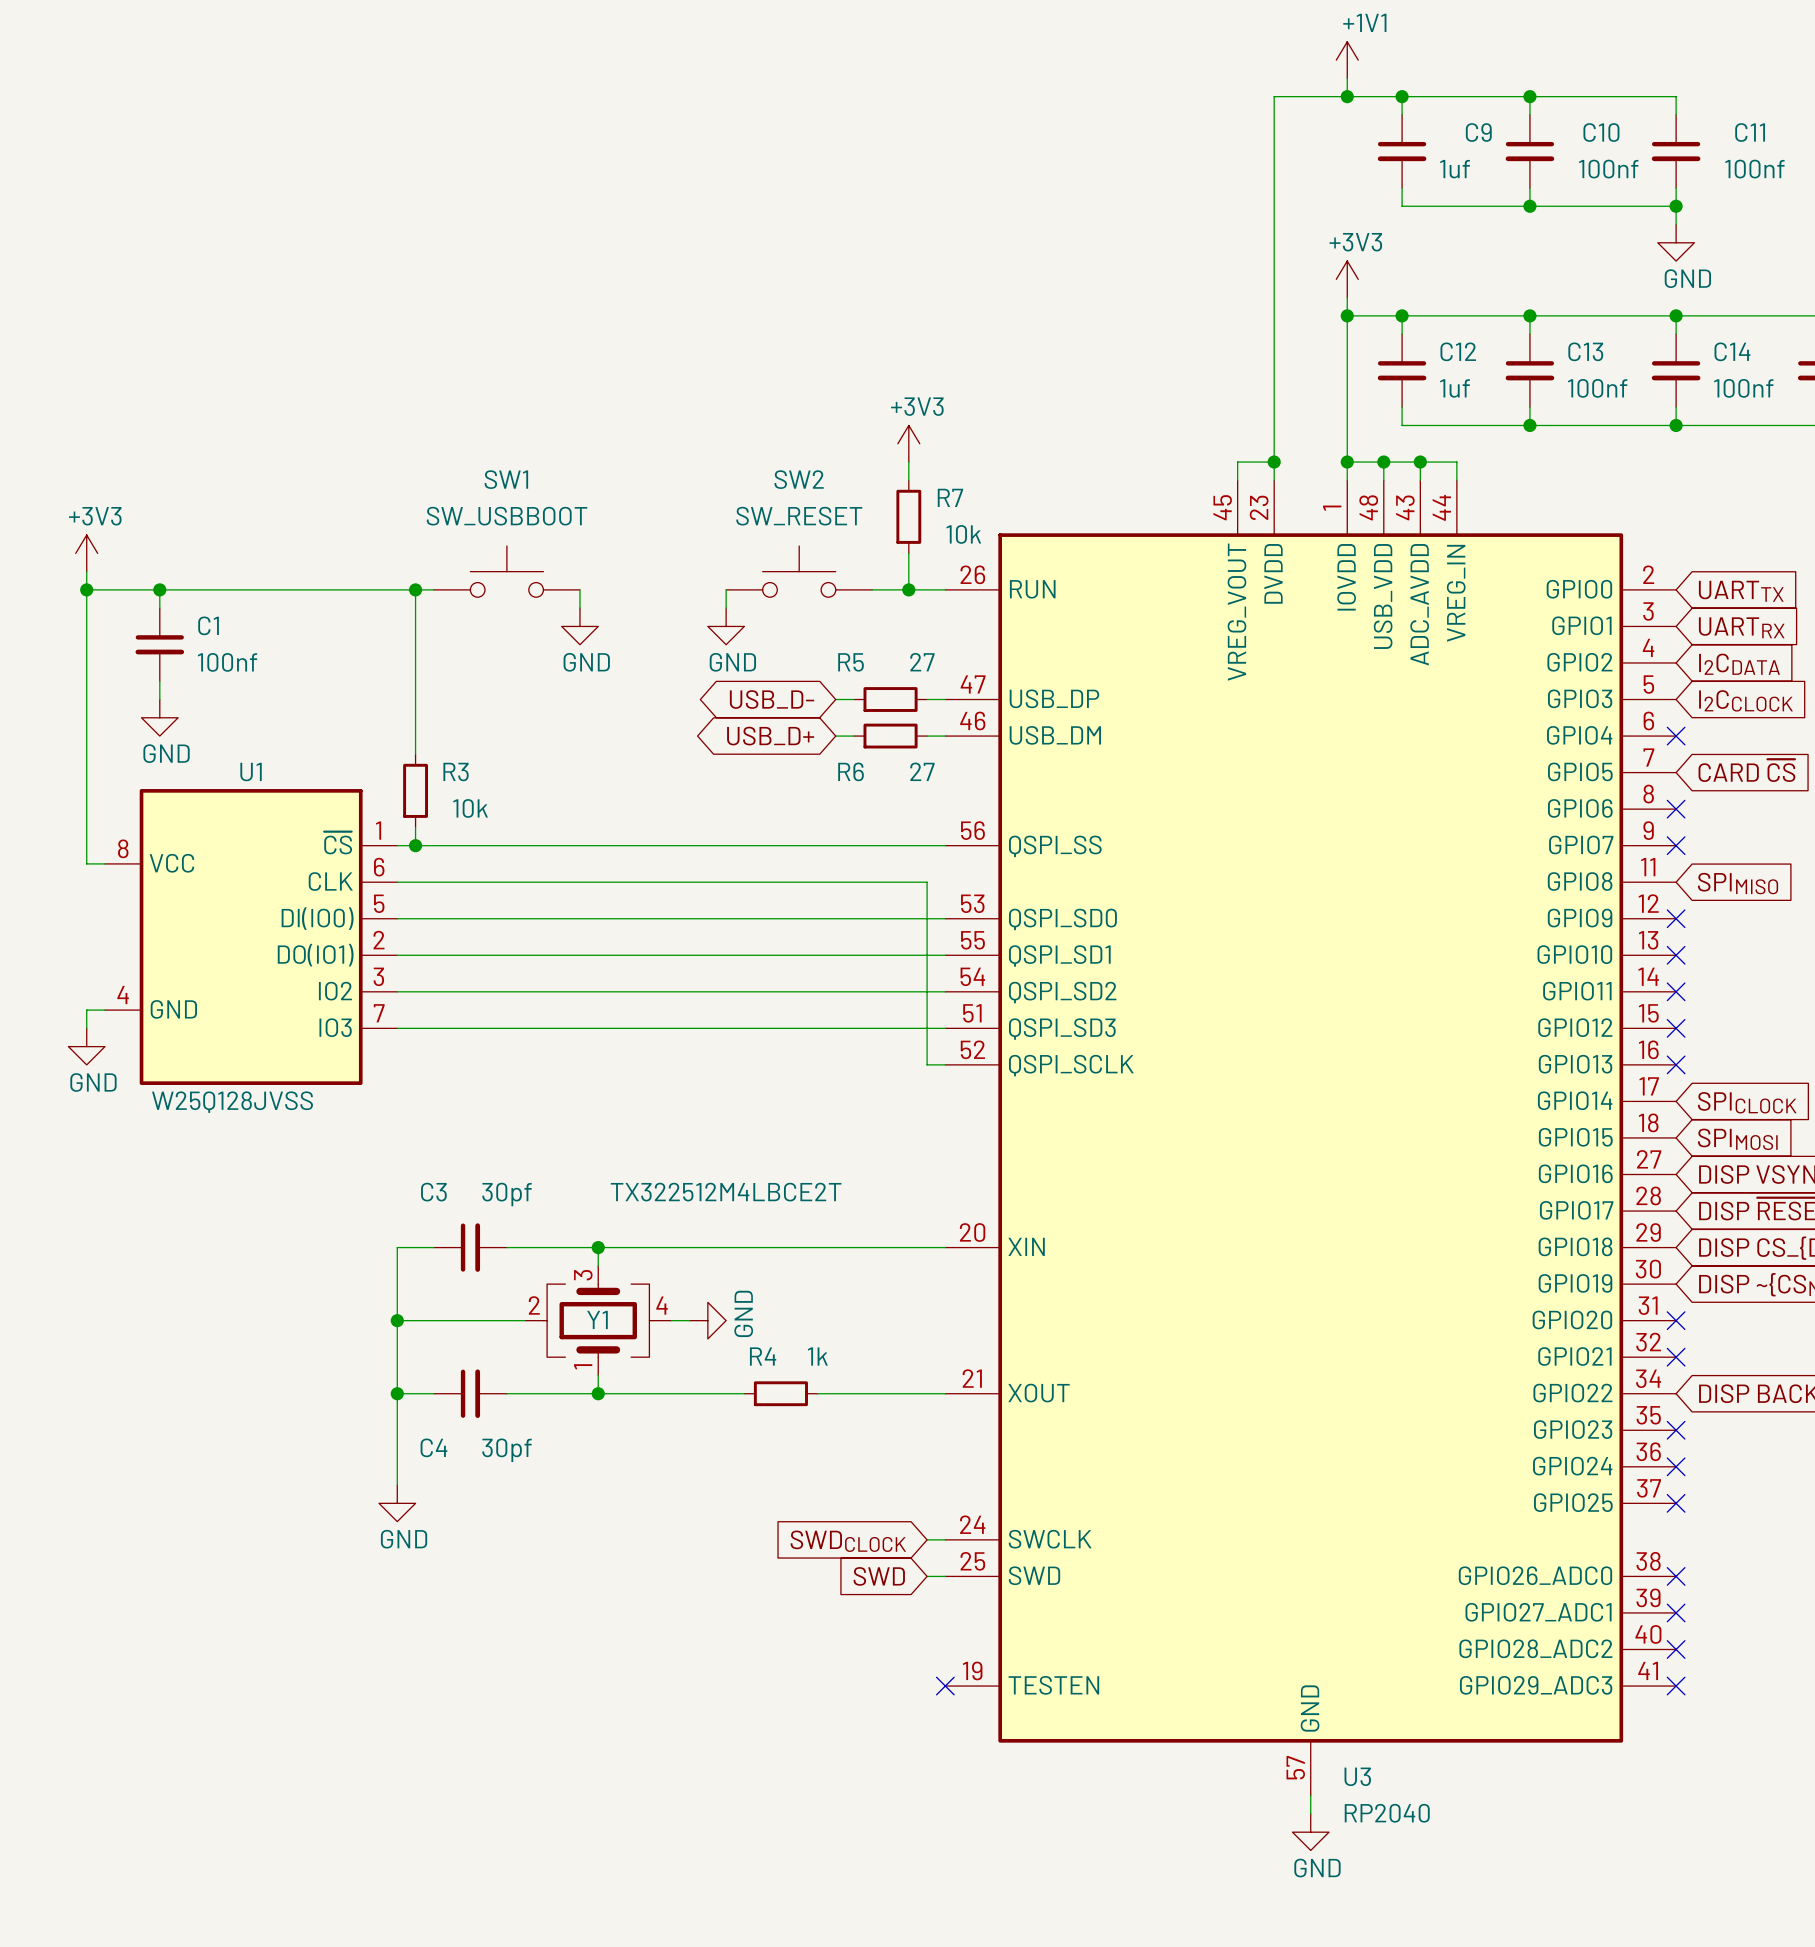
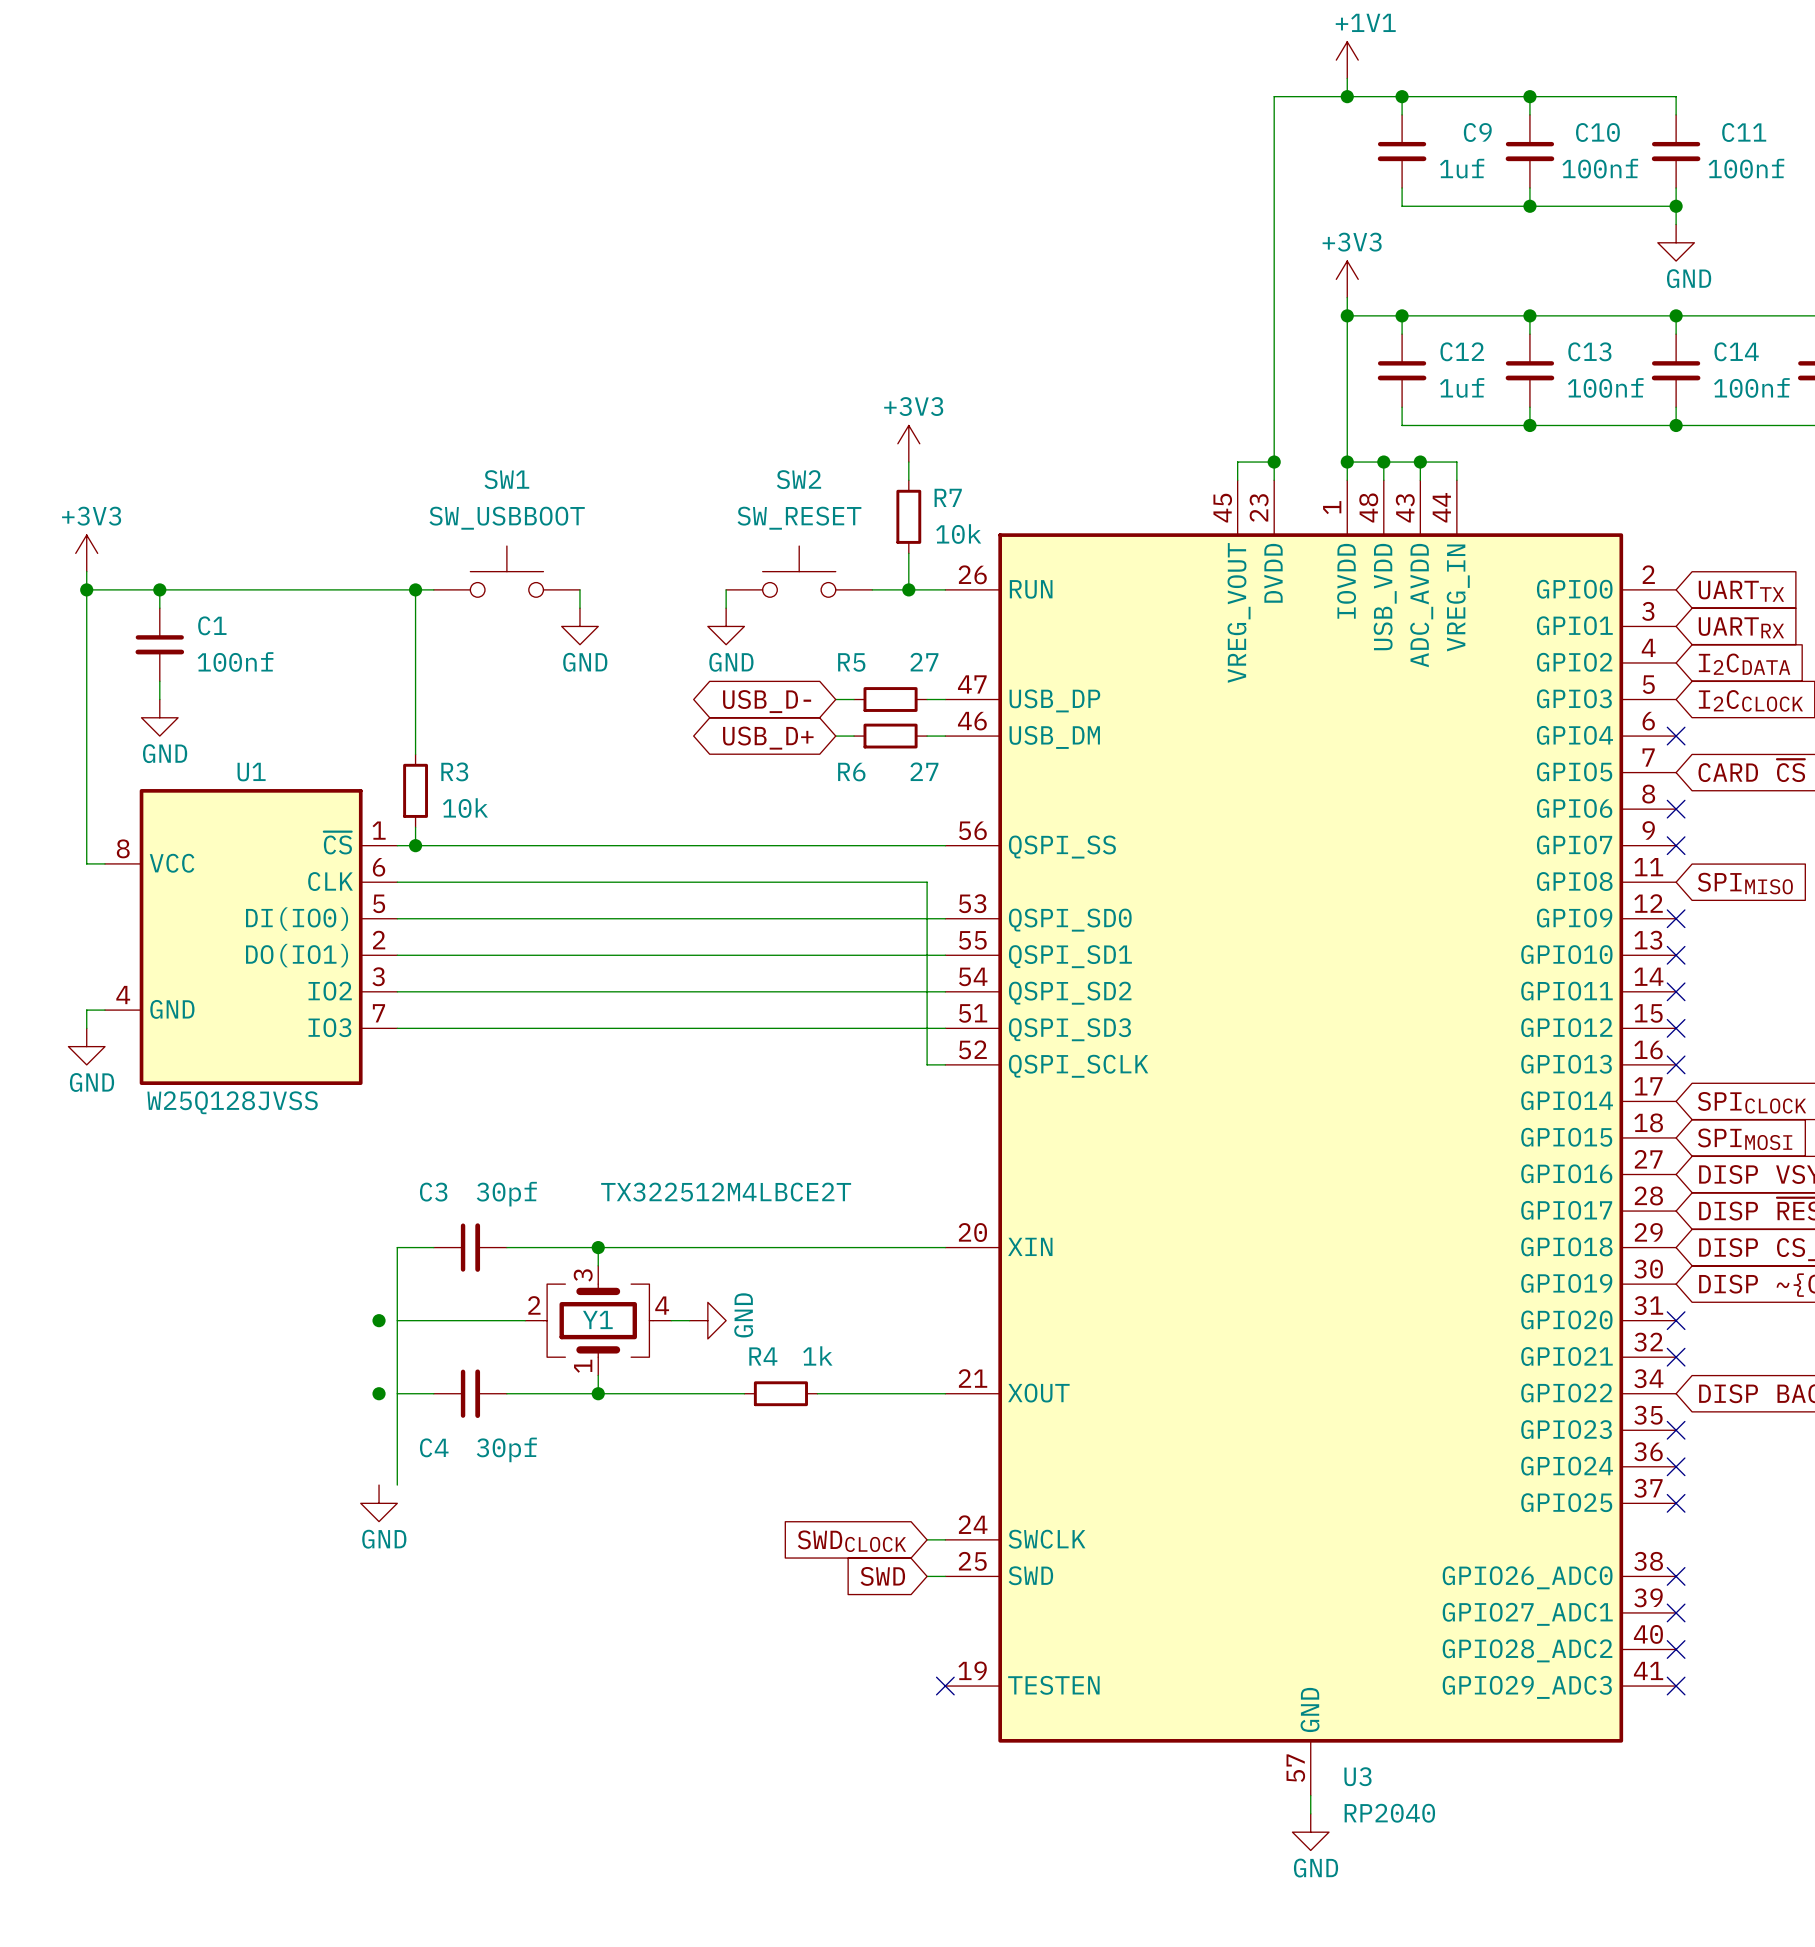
junction position: (397, 1320) -> (379, 1320)
junction position: (397, 1393) -> (379, 1393)
power symbol position: GND (397, 1503) -> GND (379, 1503)

